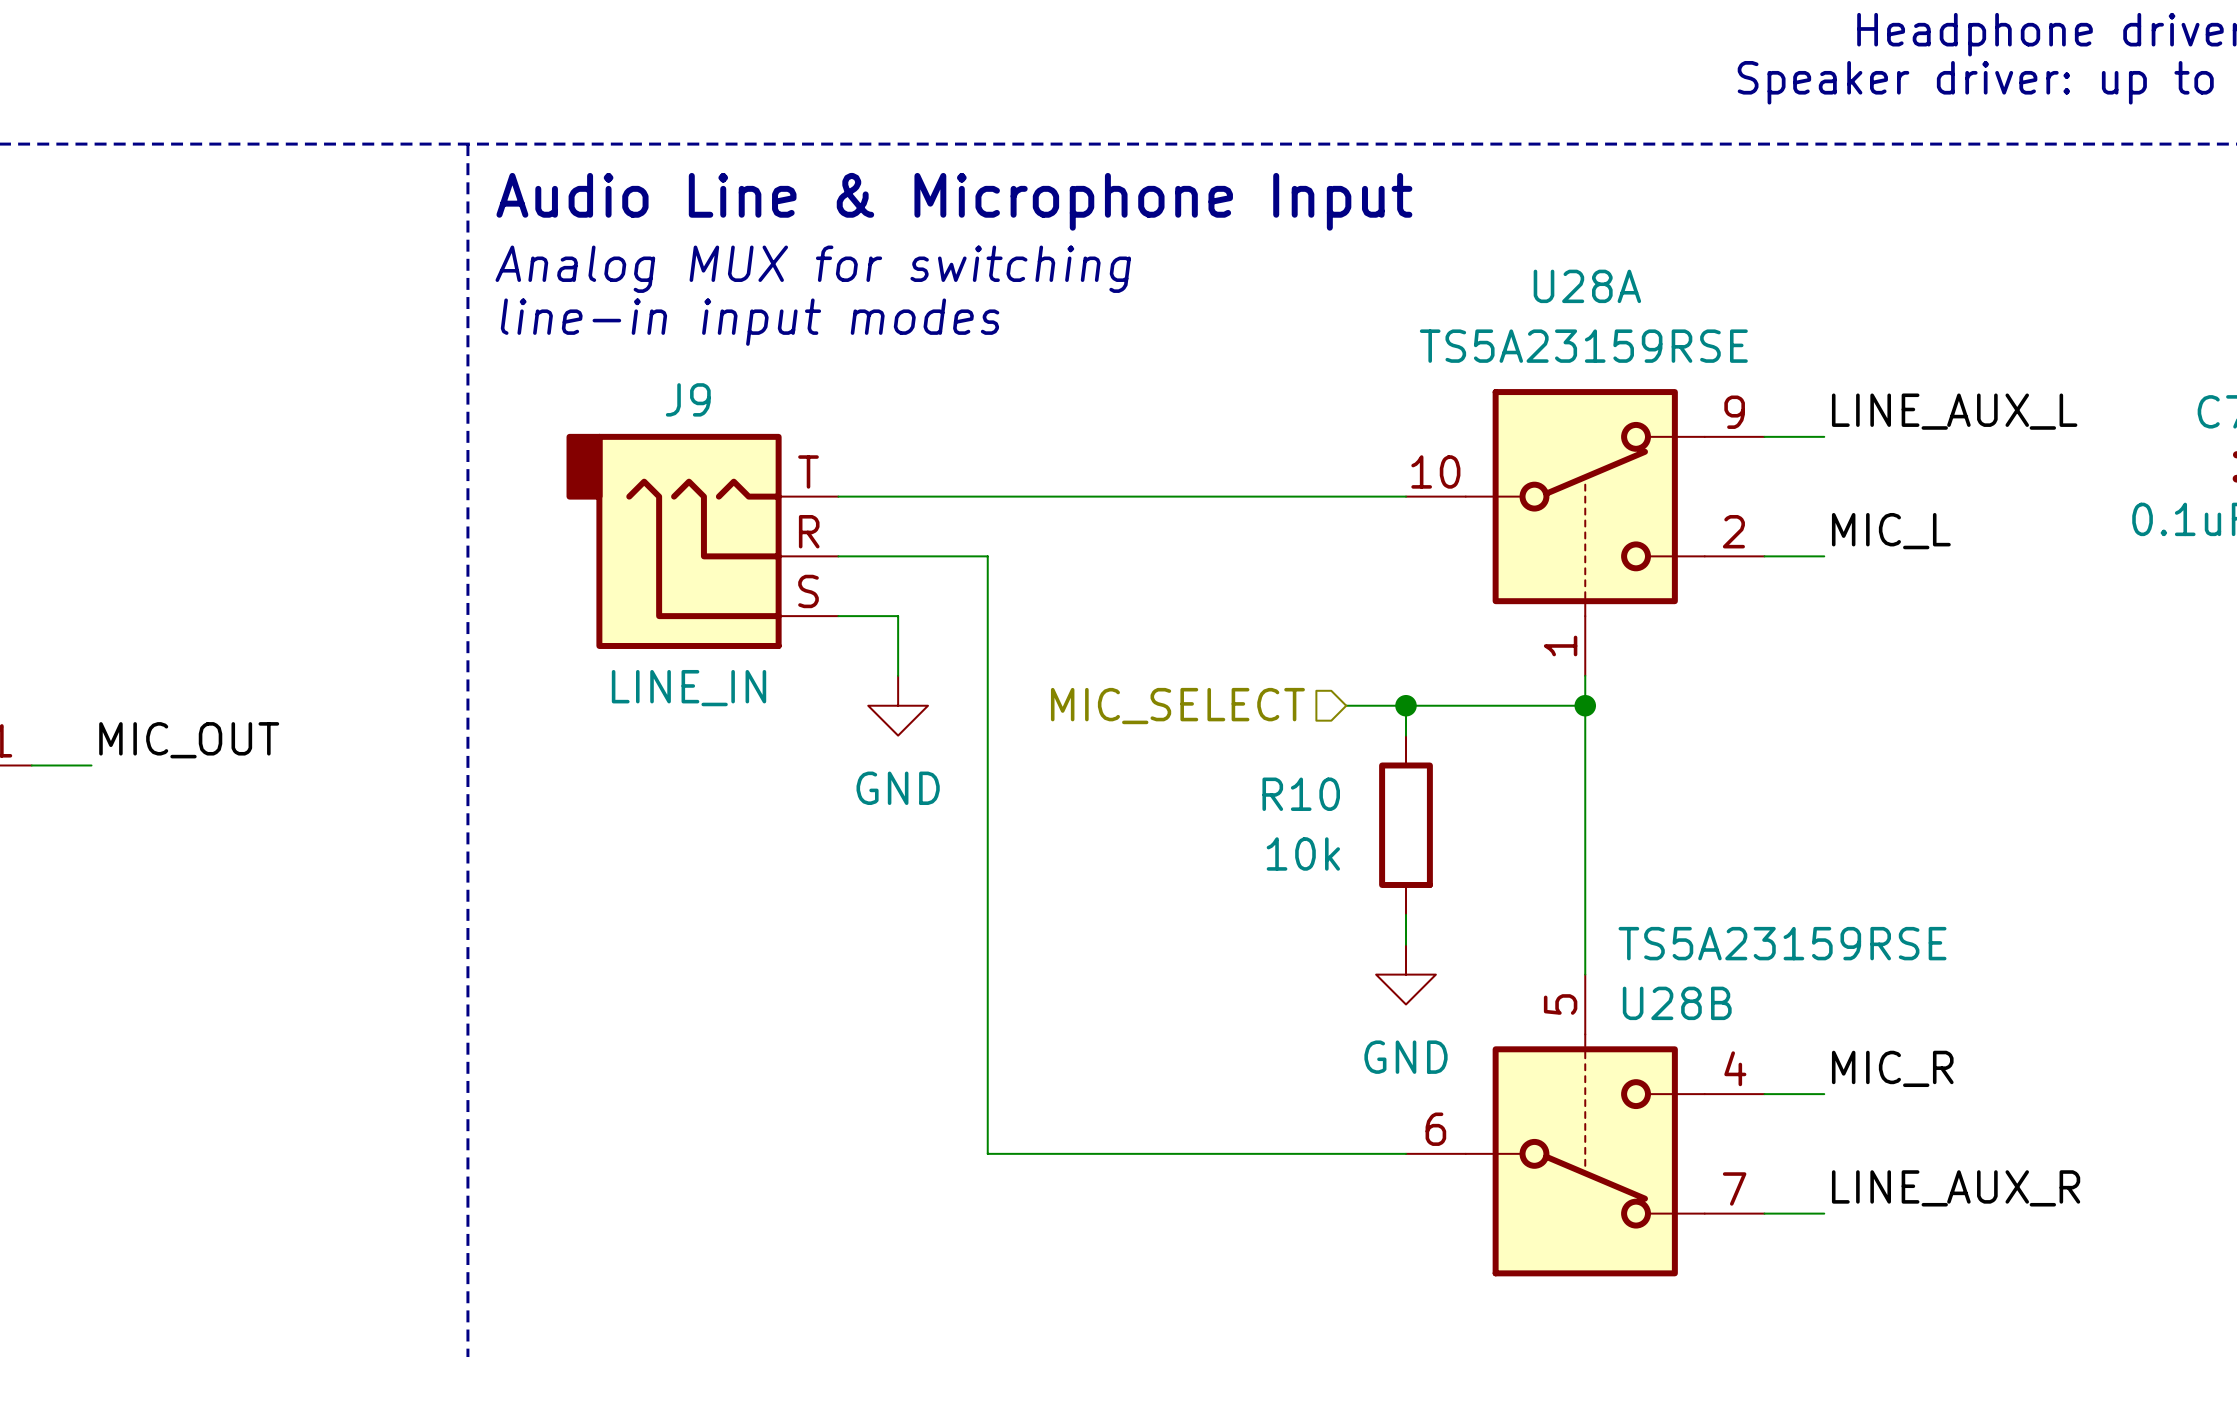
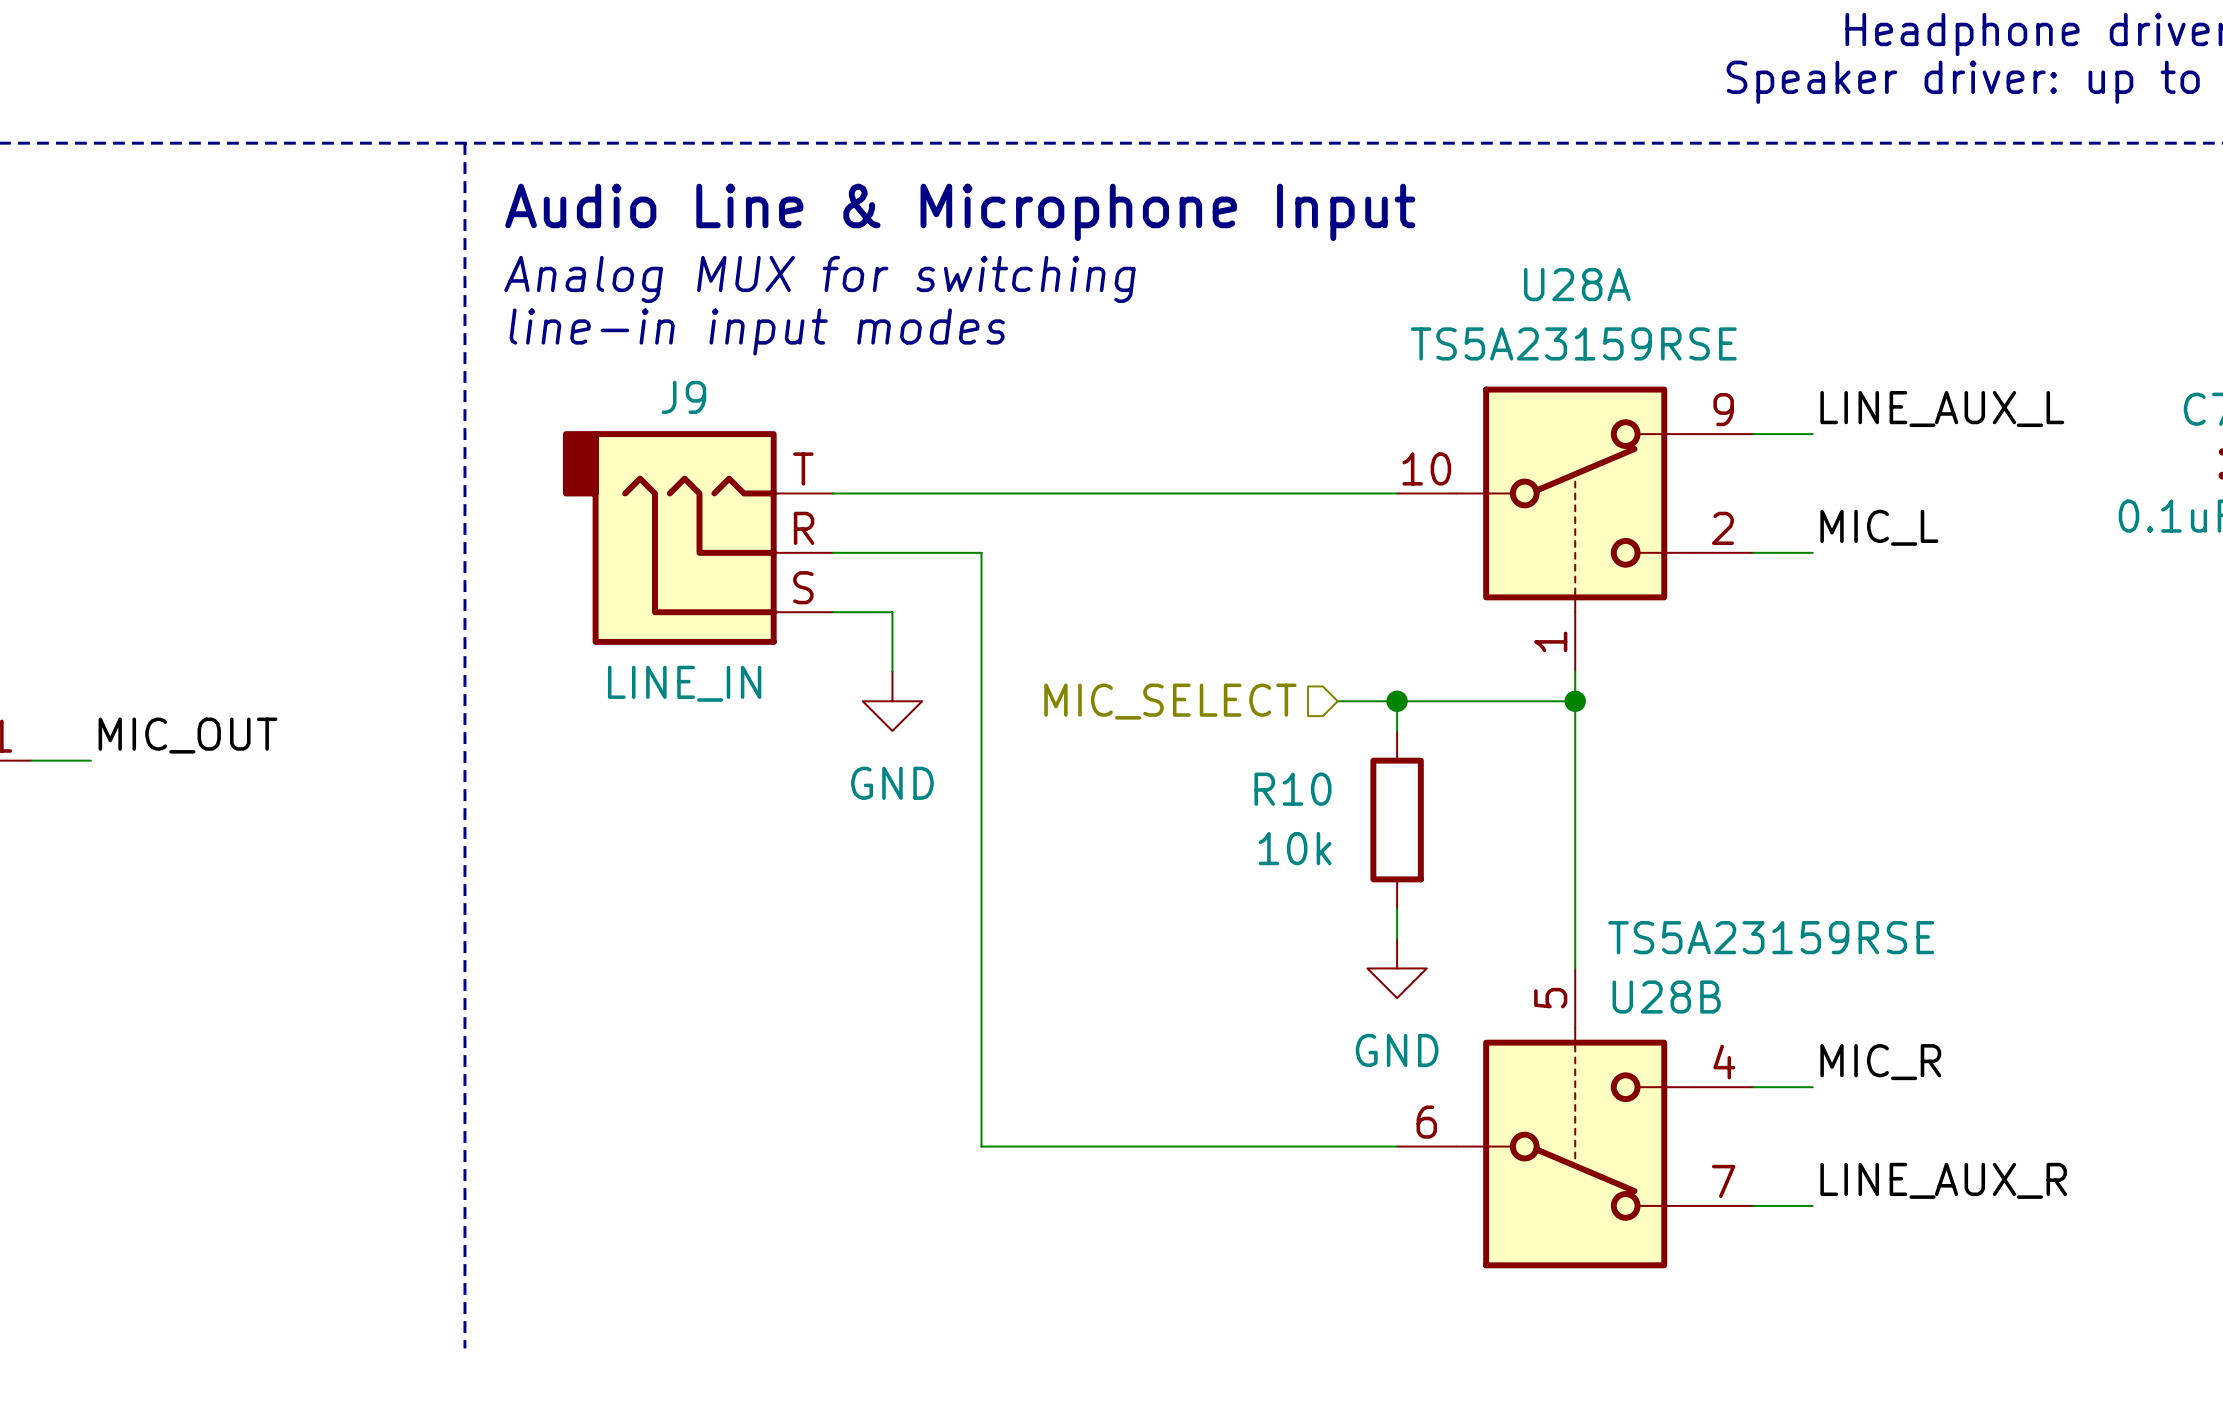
text position: Audio Line & Microphone Input (954, 201) -> Audio Line & Microphone Input (960, 212)
text position: Analog MUX for switching (813, 269) -> Analog MUX for switching (819, 279)
text position: line-in input modes (750, 322) -> line-in input modes (757, 331)

